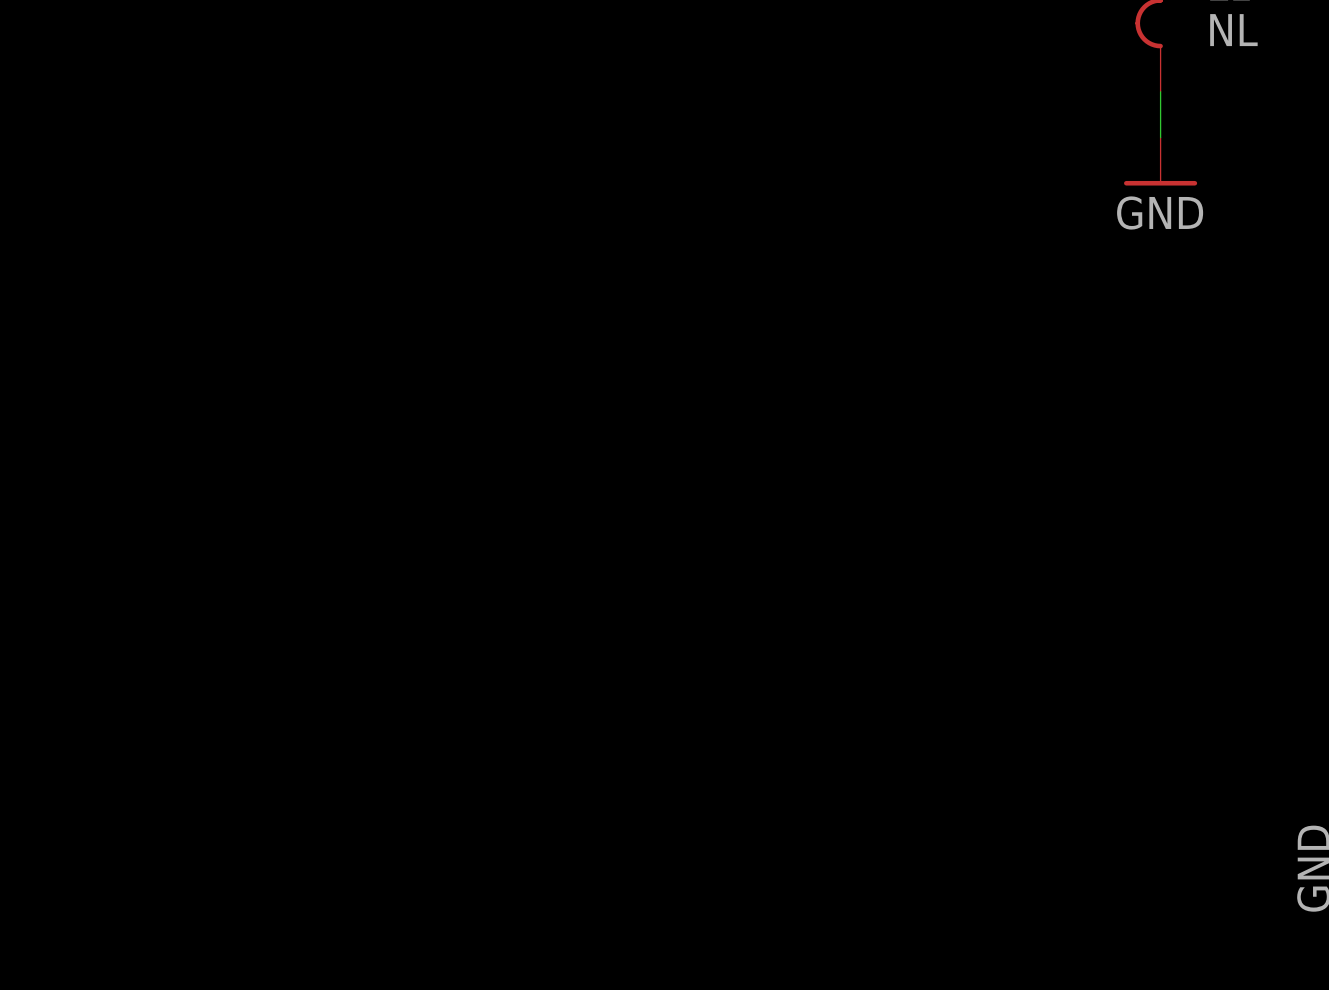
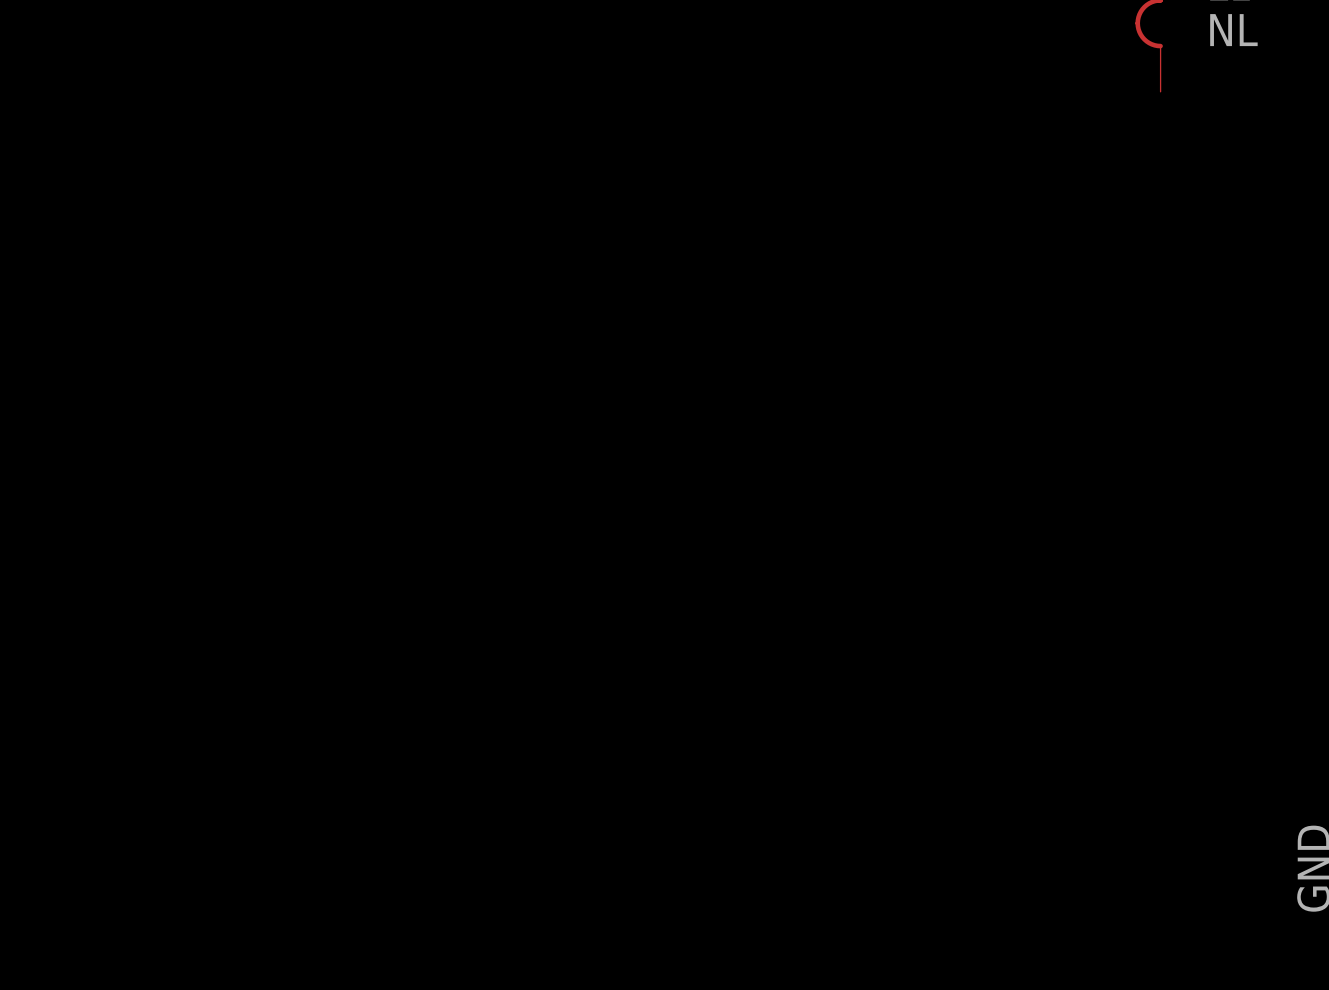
wire: (1160, 91) (1160, 137) -> none
power symbol: GND (1160, 161) -> none

